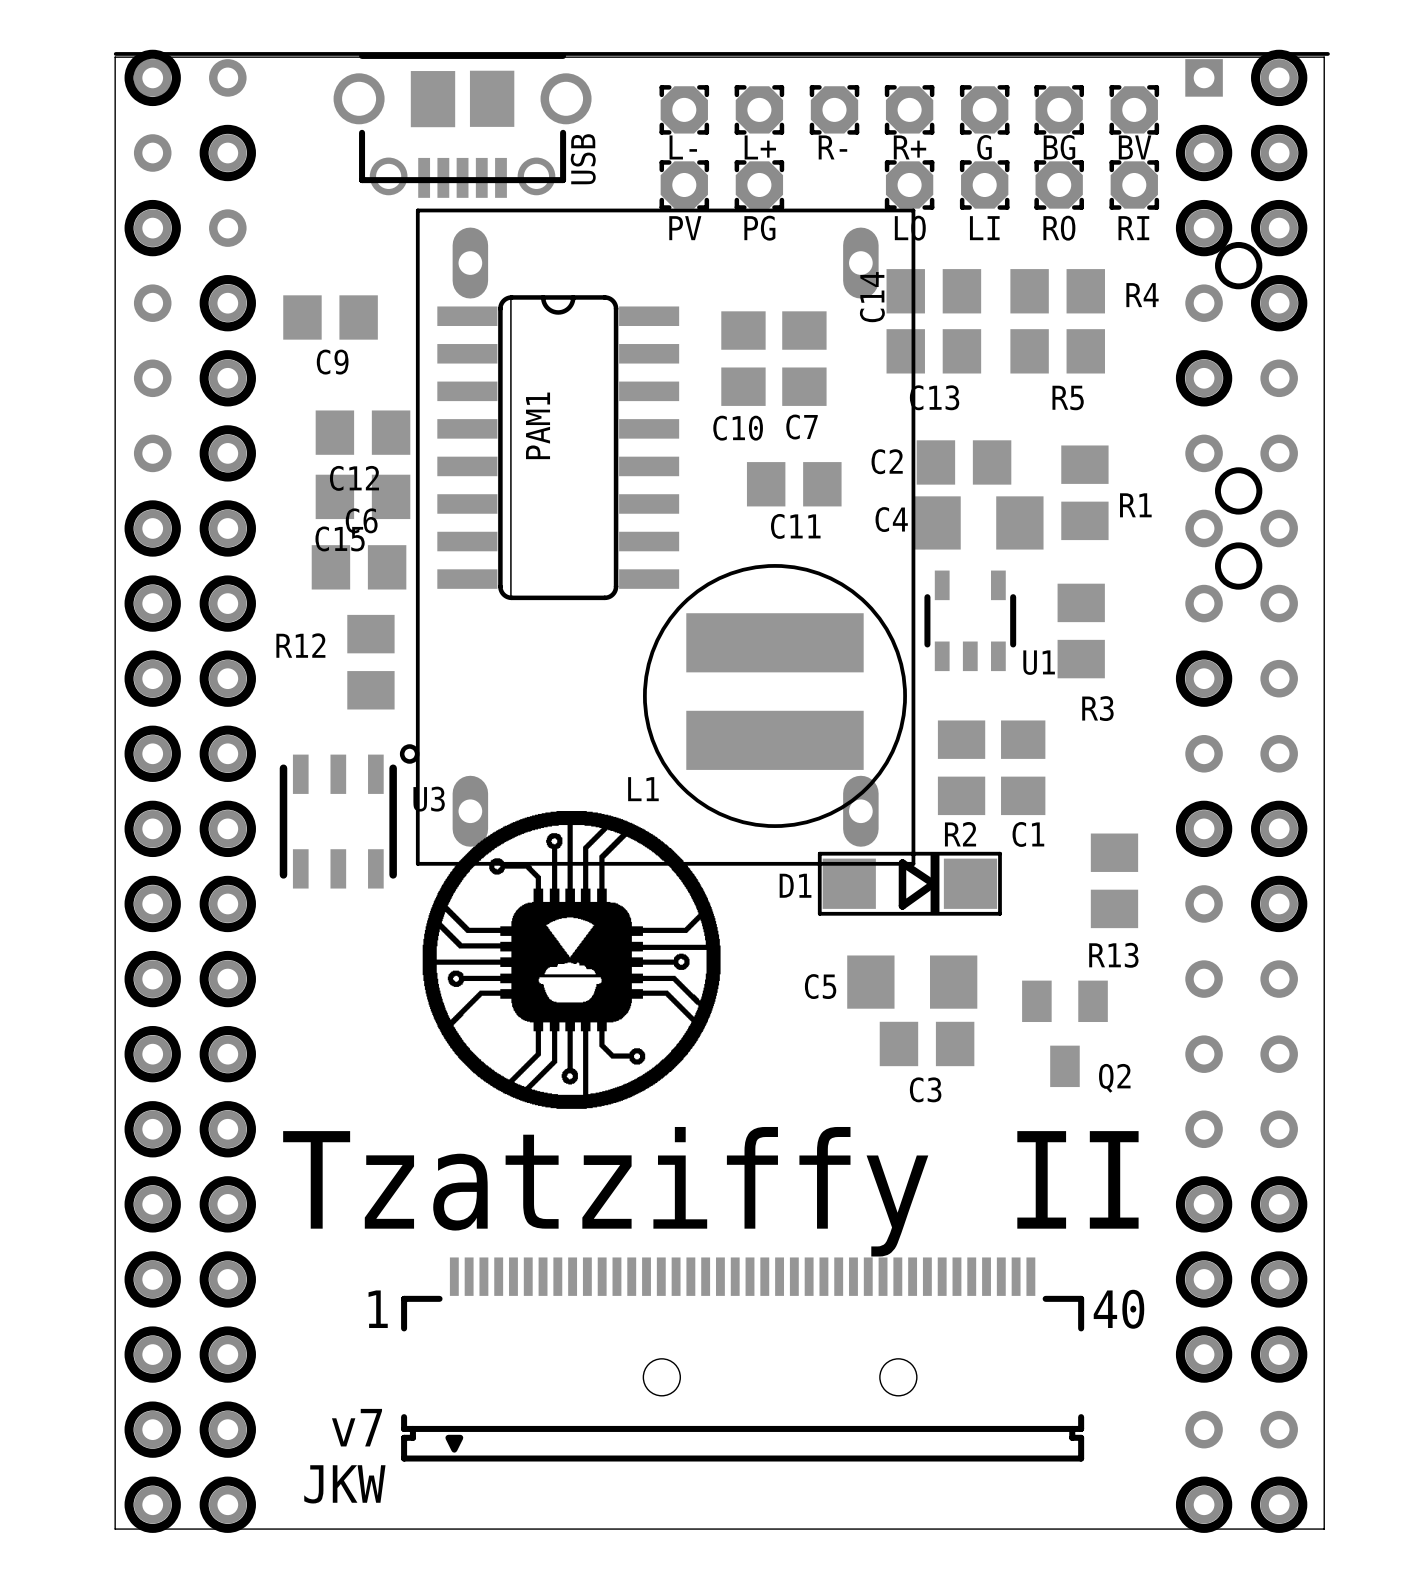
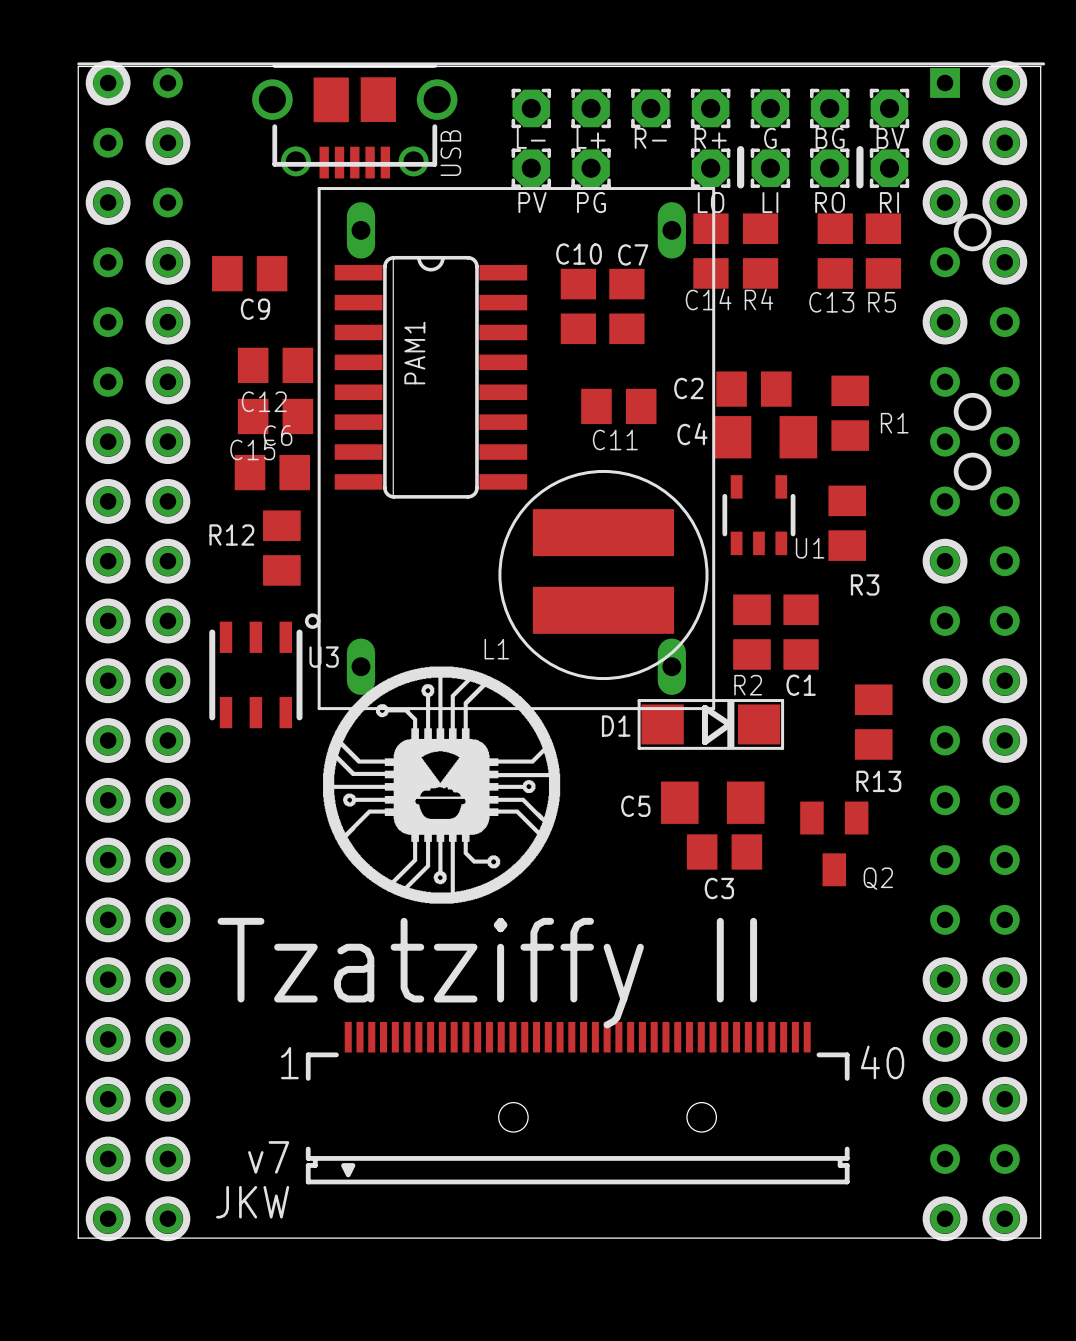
line: none -> (740, 149) (740, 184)
line: none -> (859, 149) (859, 184)
C14 rotation: 0° (933, 291) -> 90° clockwise (710, 251)
R4 rotation: 0° (1057, 291) -> 90° clockwise (760, 251)
R4 position: (1057, 291) -> (760, 251)
C14 name position: C14 (872, 297) -> C14 (708, 299)
C13 rotation: 0° (933, 351) -> 90° clockwise (835, 251)
C13 position: (933, 351) -> (835, 251)
R5 rotation: 0° (1057, 351) -> 90° clockwise (883, 251)
R5 position: (1057, 351) -> (883, 251)
C7 name position: C7 (802, 427) -> C7 (633, 254)
C10 name position: C10 (738, 428) -> C10 (579, 254)

